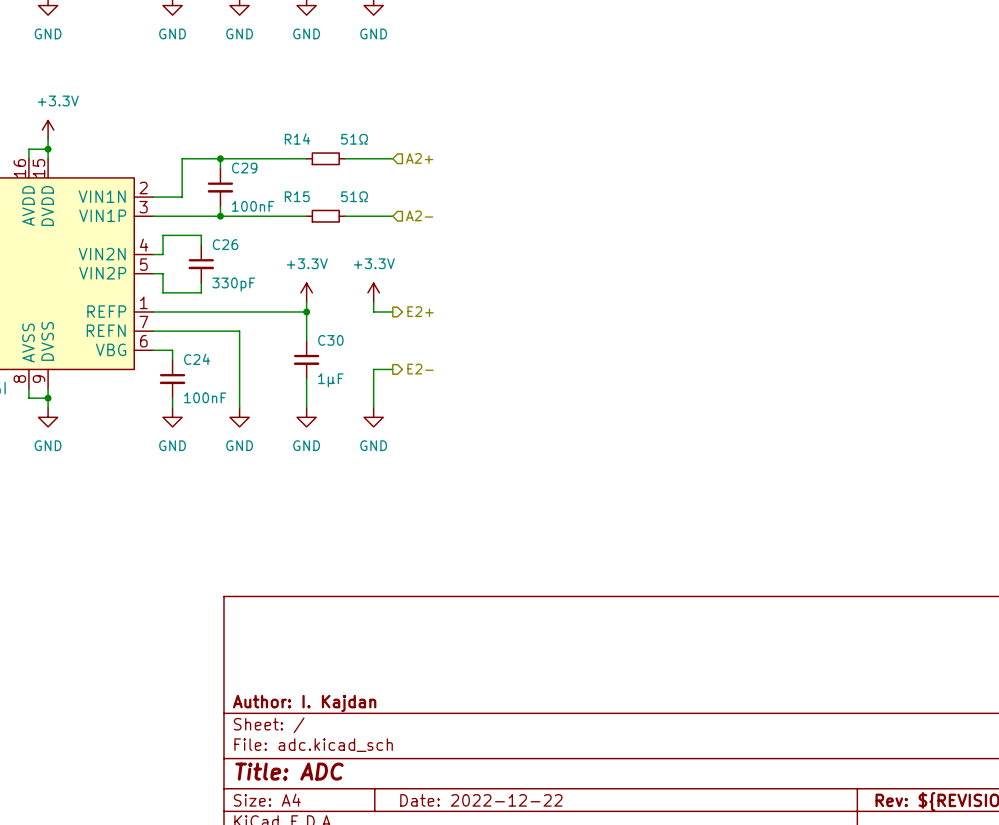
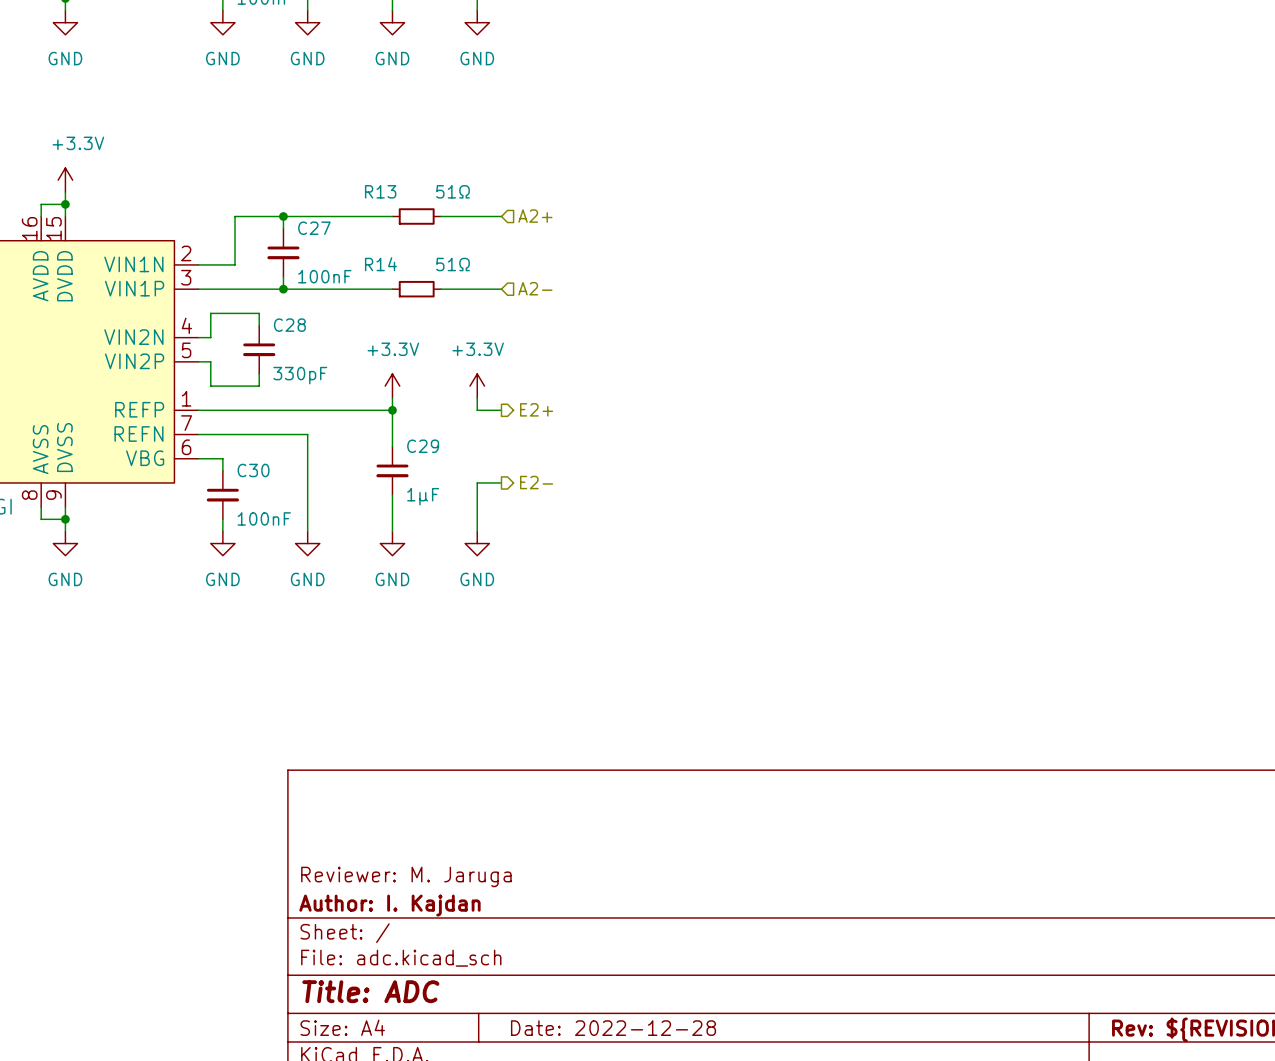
R14 name: R14 (297, 139) -> R13 (380, 191)
C29 name: C29 (244, 168) -> C27 (314, 228)
R15 name: R15 (297, 196) -> R14 (380, 264)
C26 name: C26 (225, 244) -> C28 (289, 325)
C30 name: C30 (330, 340) -> C29 (423, 446)
C24 name: C24 (197, 359) -> C30 (253, 470)
title block: none -> Reviewer: M. Jaruga (406, 876)
title block: Date: 2022-12-22 (481, 800) -> Date: 2022-12-28 (613, 1028)

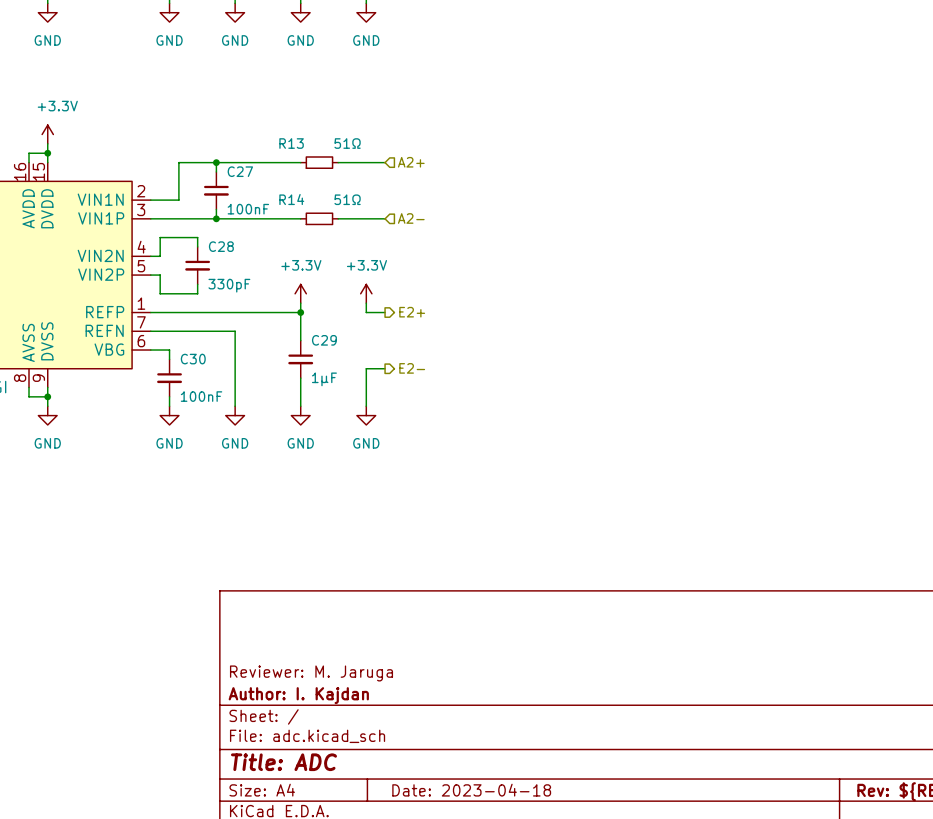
title block: Date: 2022-12-28 (613, 1028) -> Date: 2023-04-18 (471, 790)

